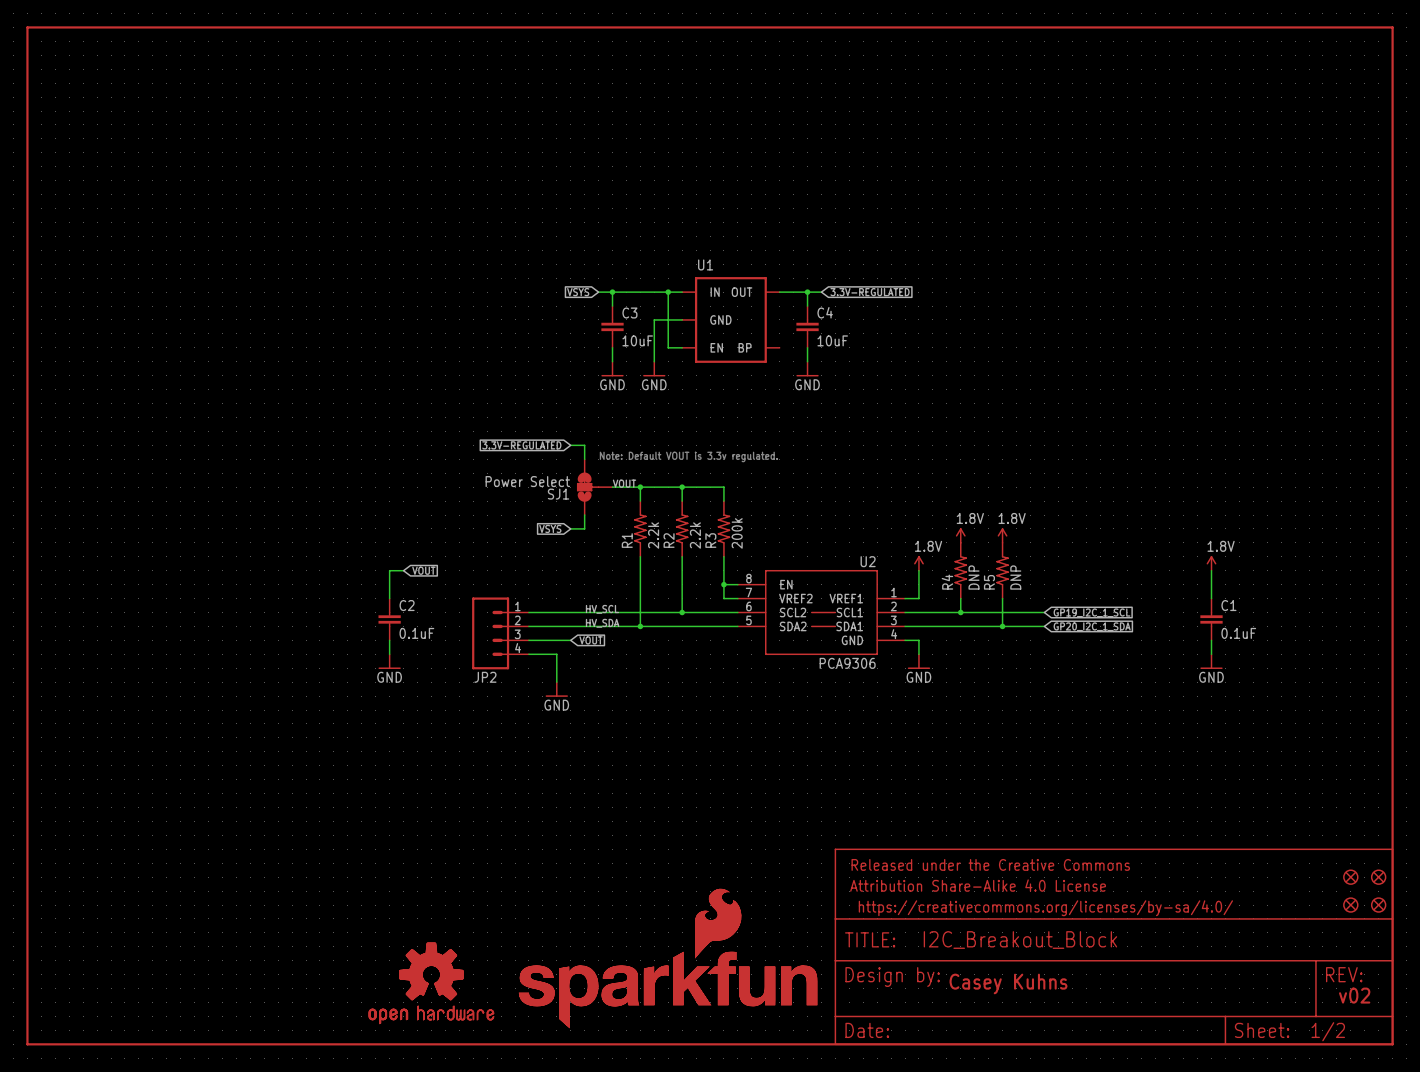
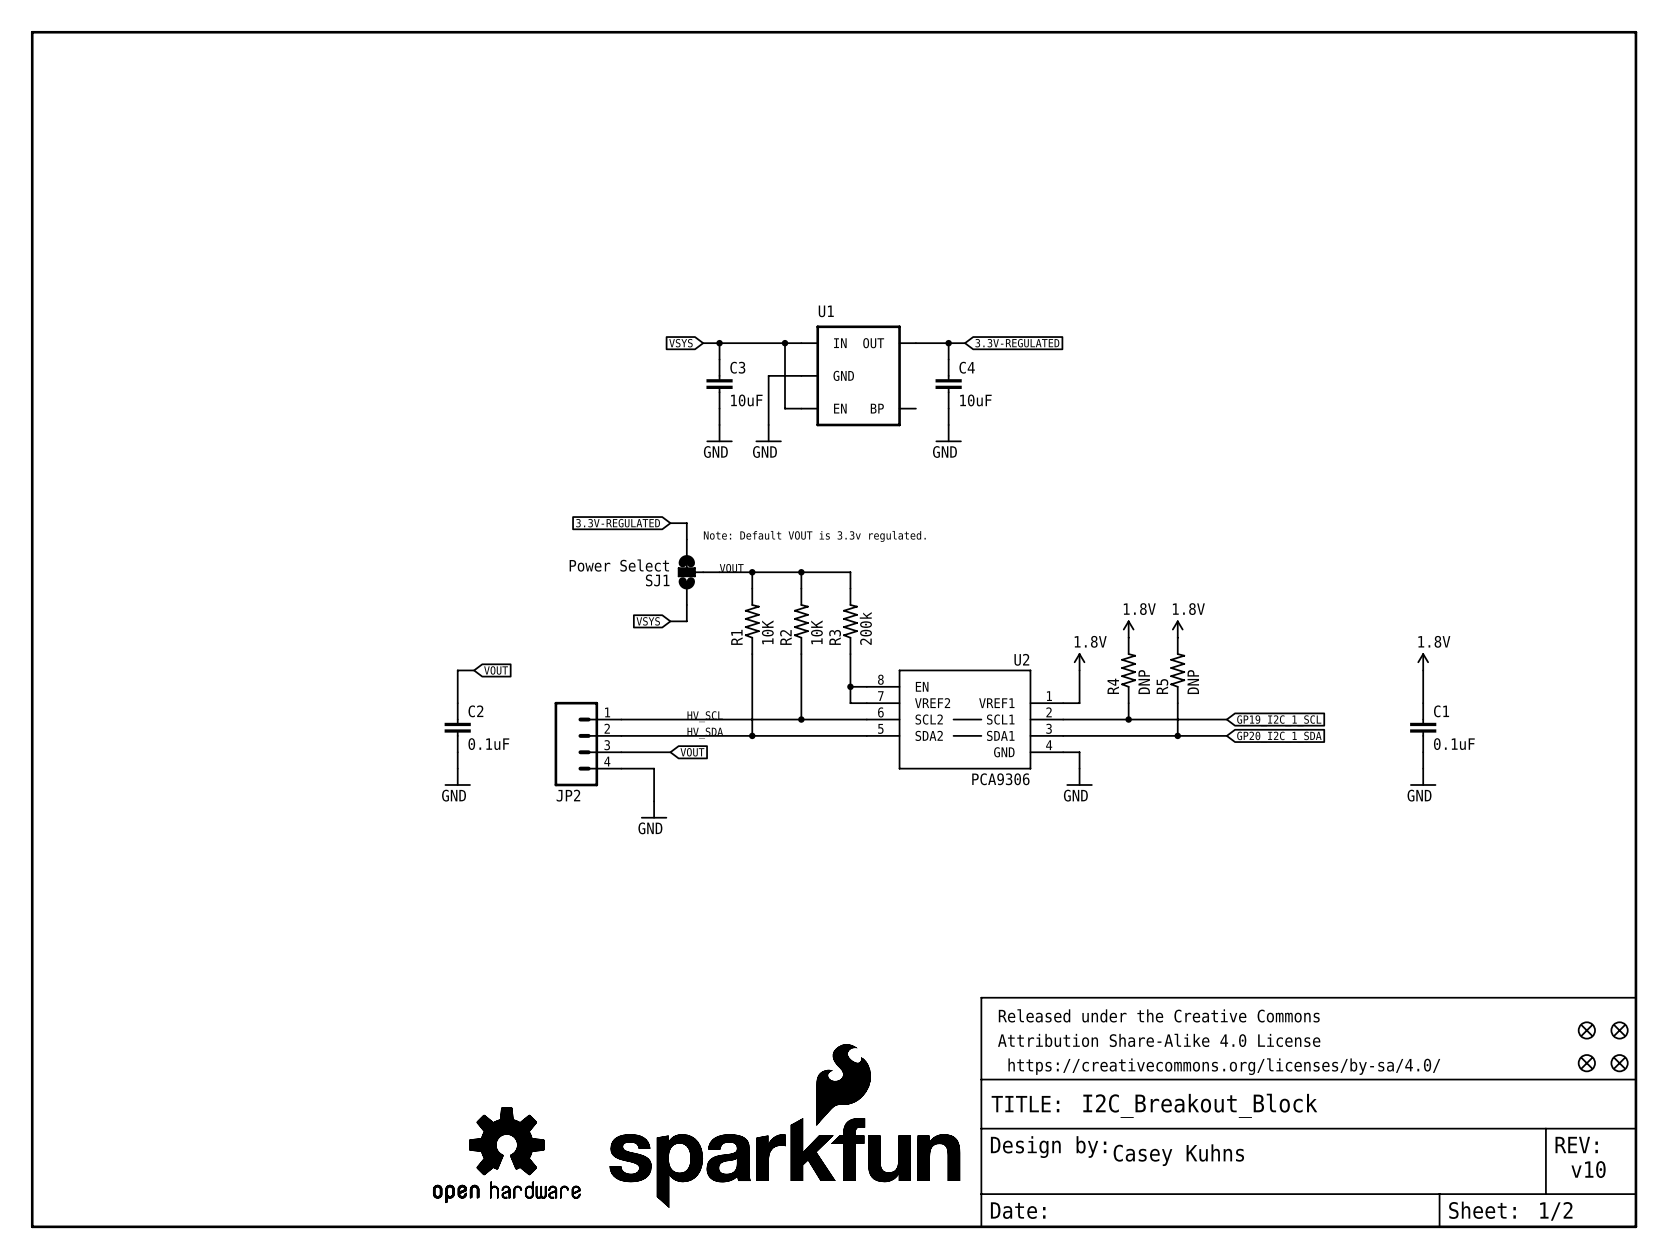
R1 value: 2.2k (653, 535) -> 10K (767, 632)
R2 value: 2.2k (695, 535) -> 10K (816, 632)
text: v02 (1354, 995) -> v10 (1588, 1169)

